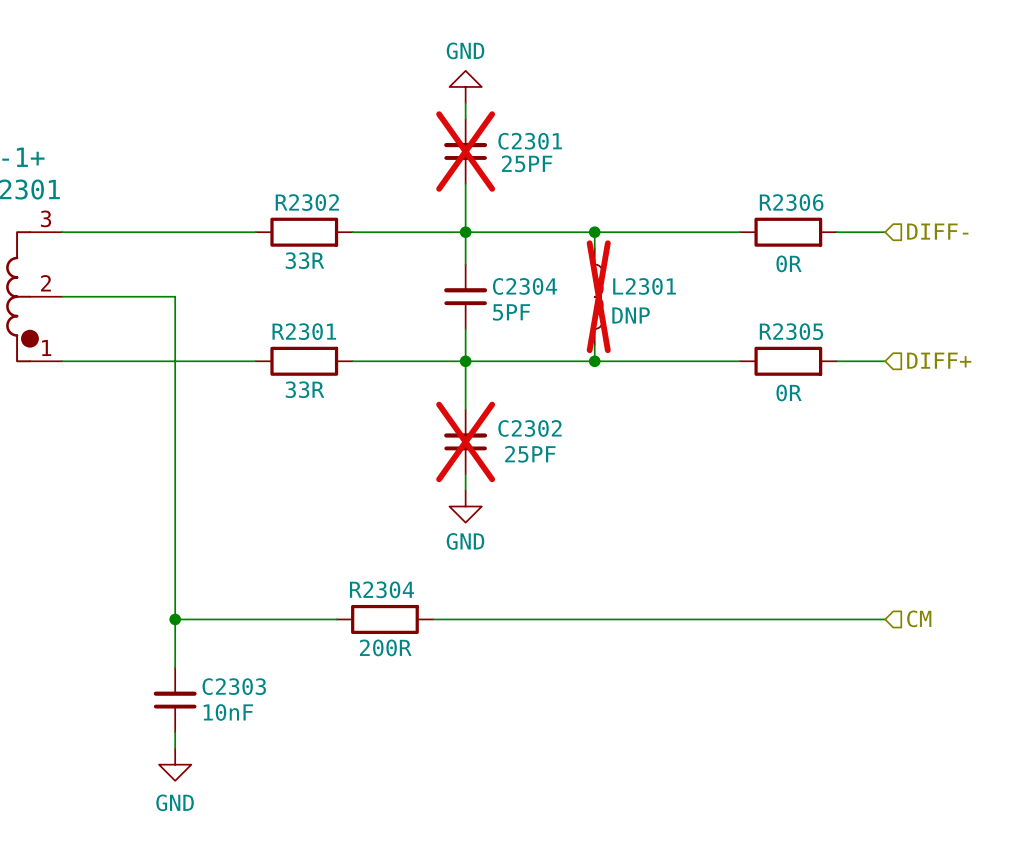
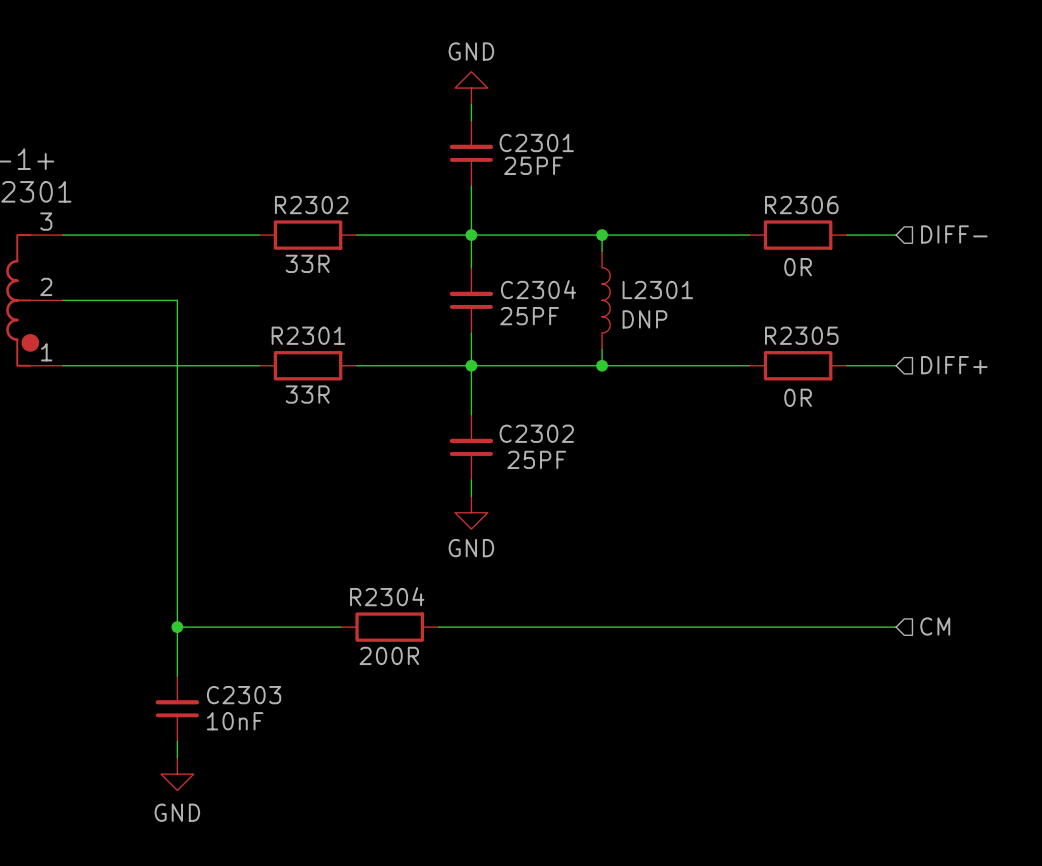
C2301 do-not-place cross: (465, 151) -> none
L2301 do-not-place cross: (598, 296) -> none
C2304 value: 5PF (511, 312) -> 25PF (529, 316)
C2302 do-not-place cross: (465, 441) -> none

